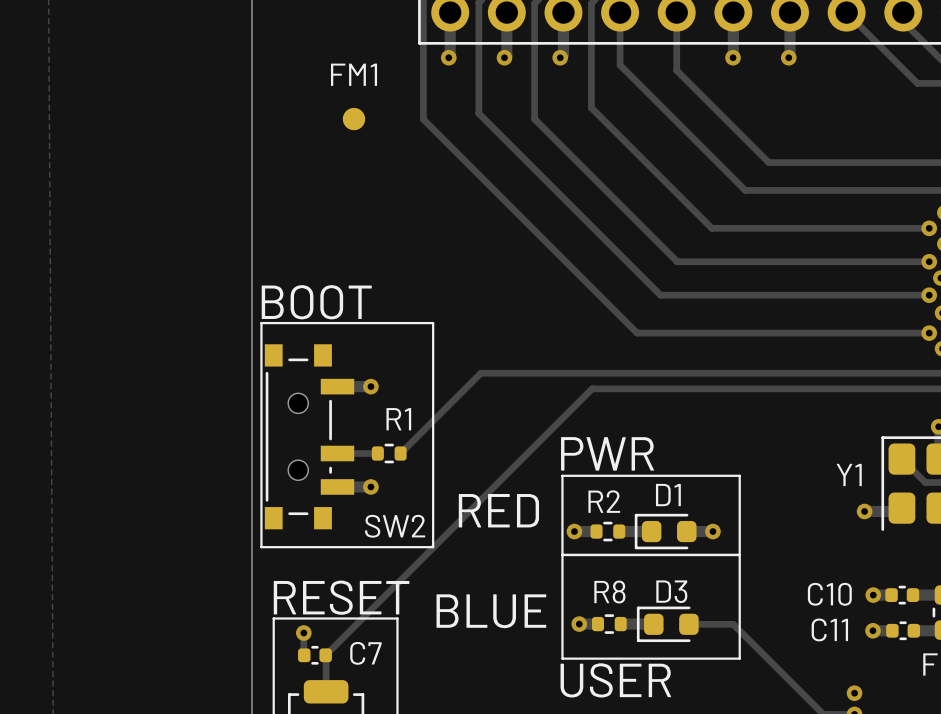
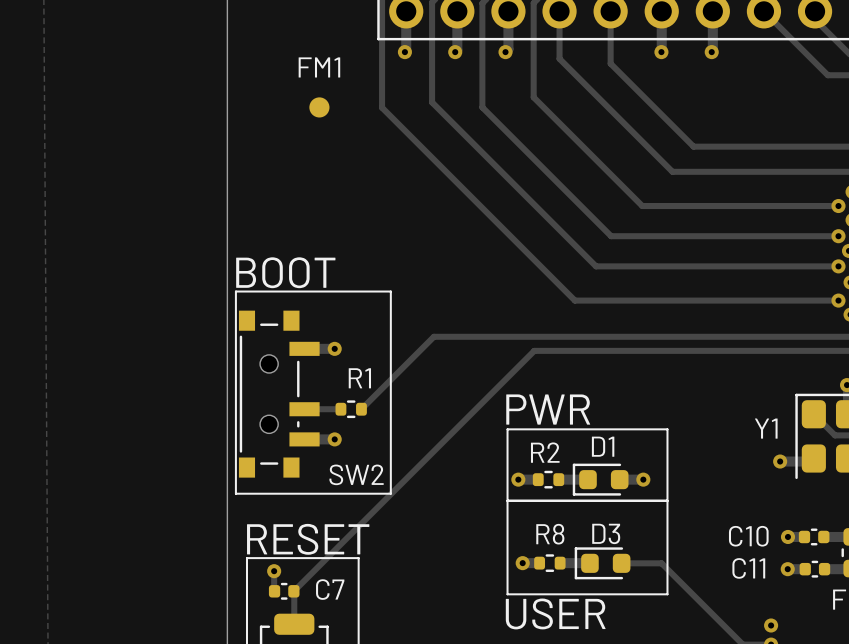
text: RED (498, 510) -> none
text: BLUE (491, 611) -> none

